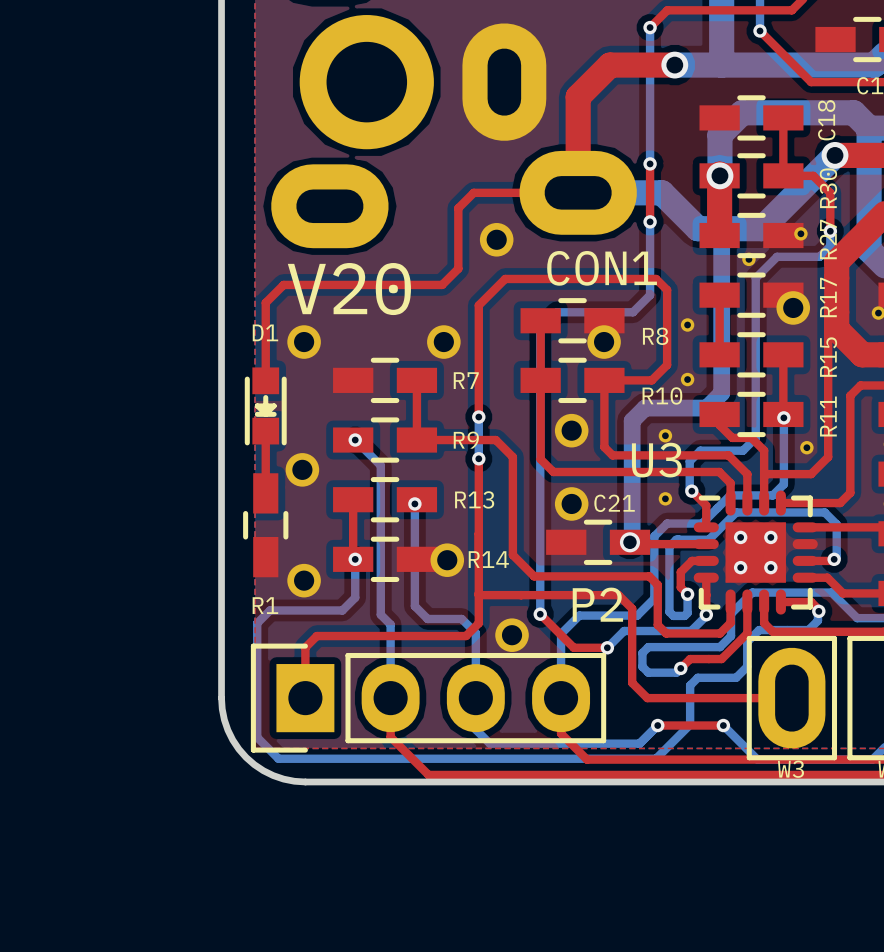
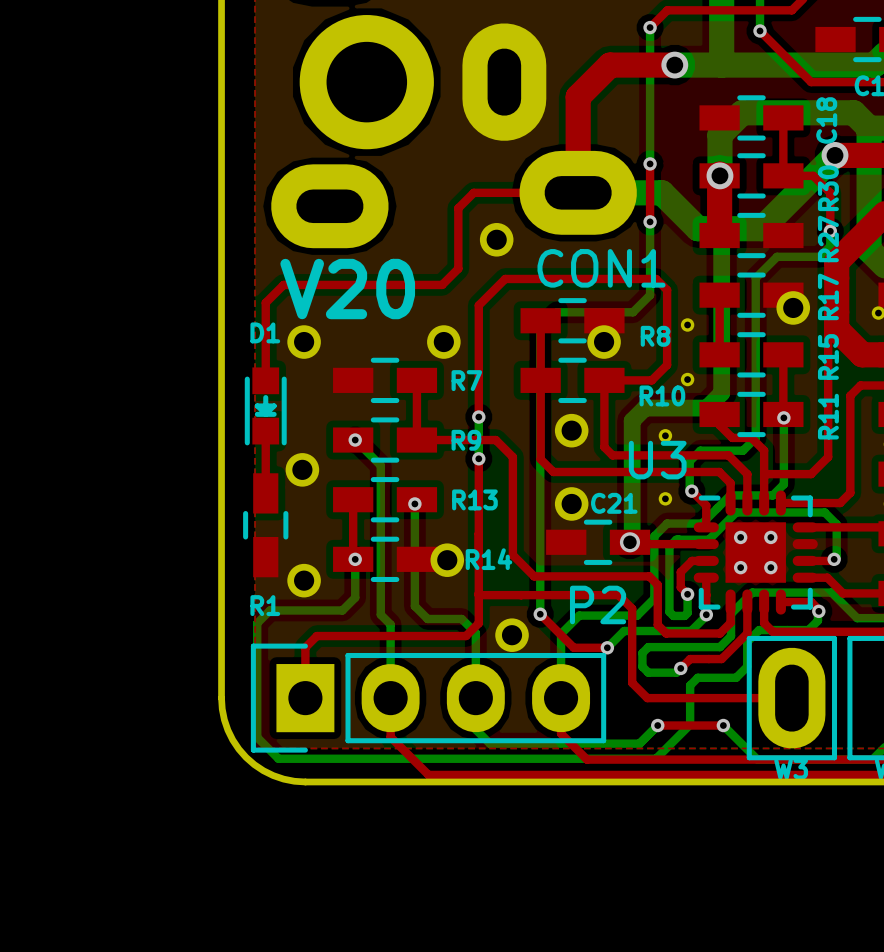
part: (800, 233) -> none
part: (748, 259) -> none
part: (806, 447) -> none

